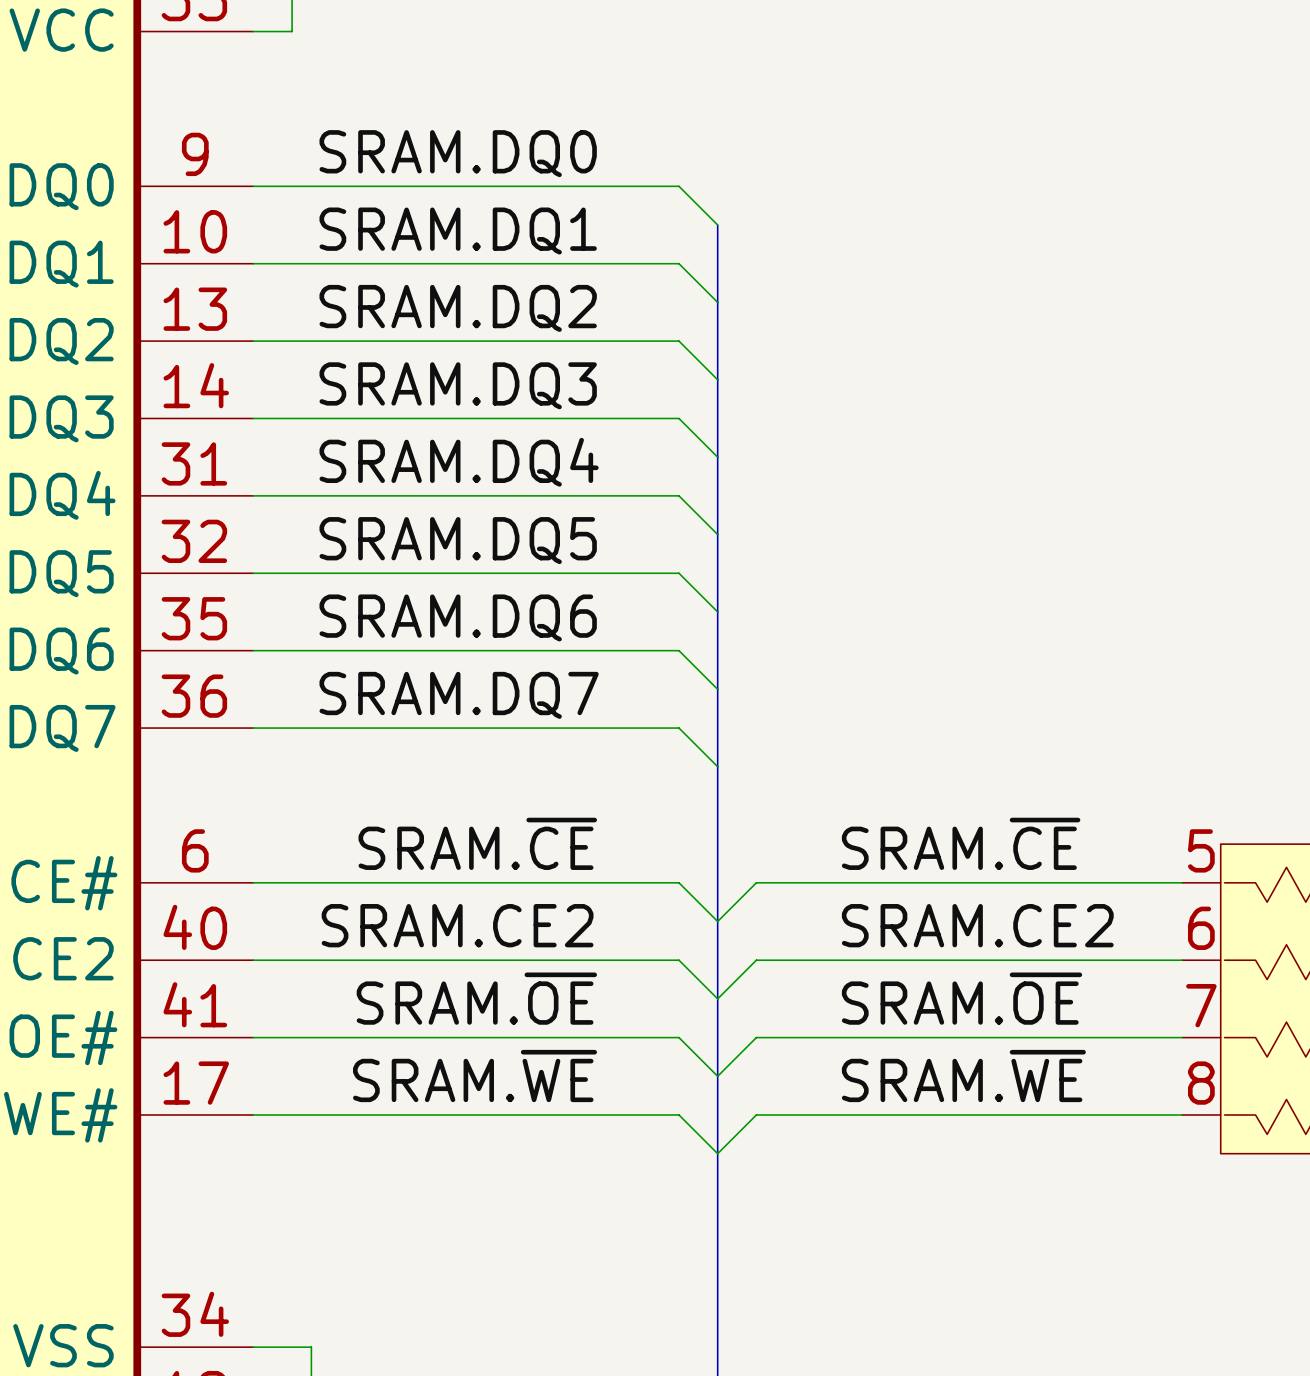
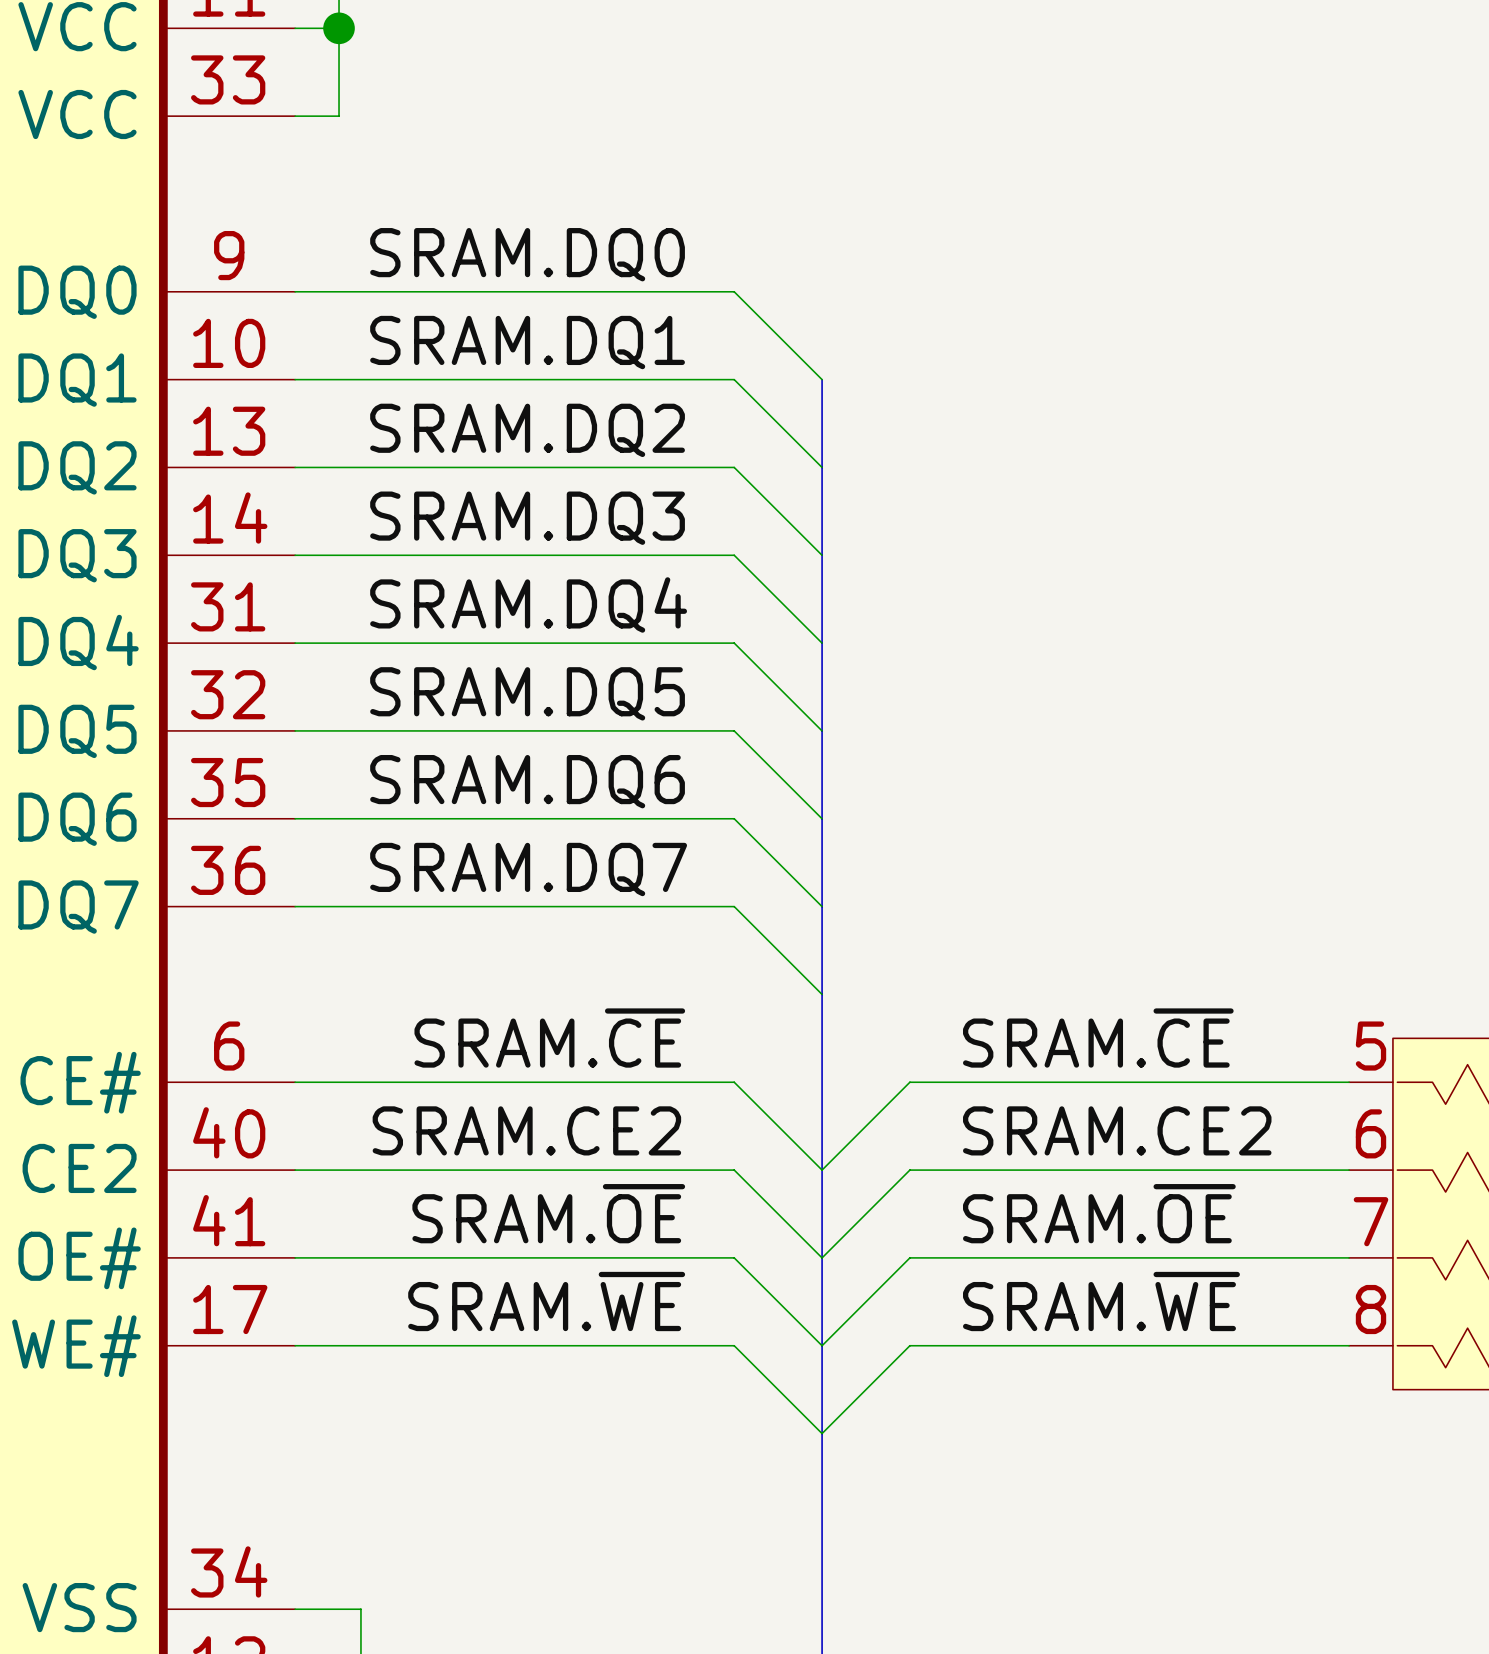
wire: (640, 186) (678, 186) (717, 225) -> (734, 291) (822, 379)
bus: (717, 225) (717, 263) -> none
wire: (640, 263) (678, 263) (717, 302) -> (734, 379) (822, 467)
wire: (640, 341) (678, 341) (717, 379) -> (734, 467) (822, 555)
wire: (640, 418) (678, 418) (717, 457) -> (734, 555) (822, 643)
wire: (640, 495) (678, 495) (717, 534) -> (734, 643) (822, 730)
wire: (640, 573) (678, 573) (717, 611) -> (734, 730) (822, 818)
wire: (640, 650) (678, 650) (717, 689) -> (734, 818) (822, 906)
wire: (640, 728) (678, 728) (717, 766) -> (734, 906) (822, 994)
wire: (640, 882) (678, 882) (717, 921) (756, 882) (795, 882) -> (734, 1082) (822, 1170) (909, 1082)
wire: (640, 960) (678, 960) (717, 998) (756, 960) (795, 960) -> (734, 1170) (822, 1257) (909, 1170)
wire: (640, 1037) (678, 1037) (717, 1076) (756, 1037) (795, 1037) -> (734, 1257) (822, 1345) (909, 1257)
wire: (640, 1114) (678, 1114) (717, 1153) (756, 1114) (795, 1114) -> (734, 1345) (822, 1433) (909, 1345)

